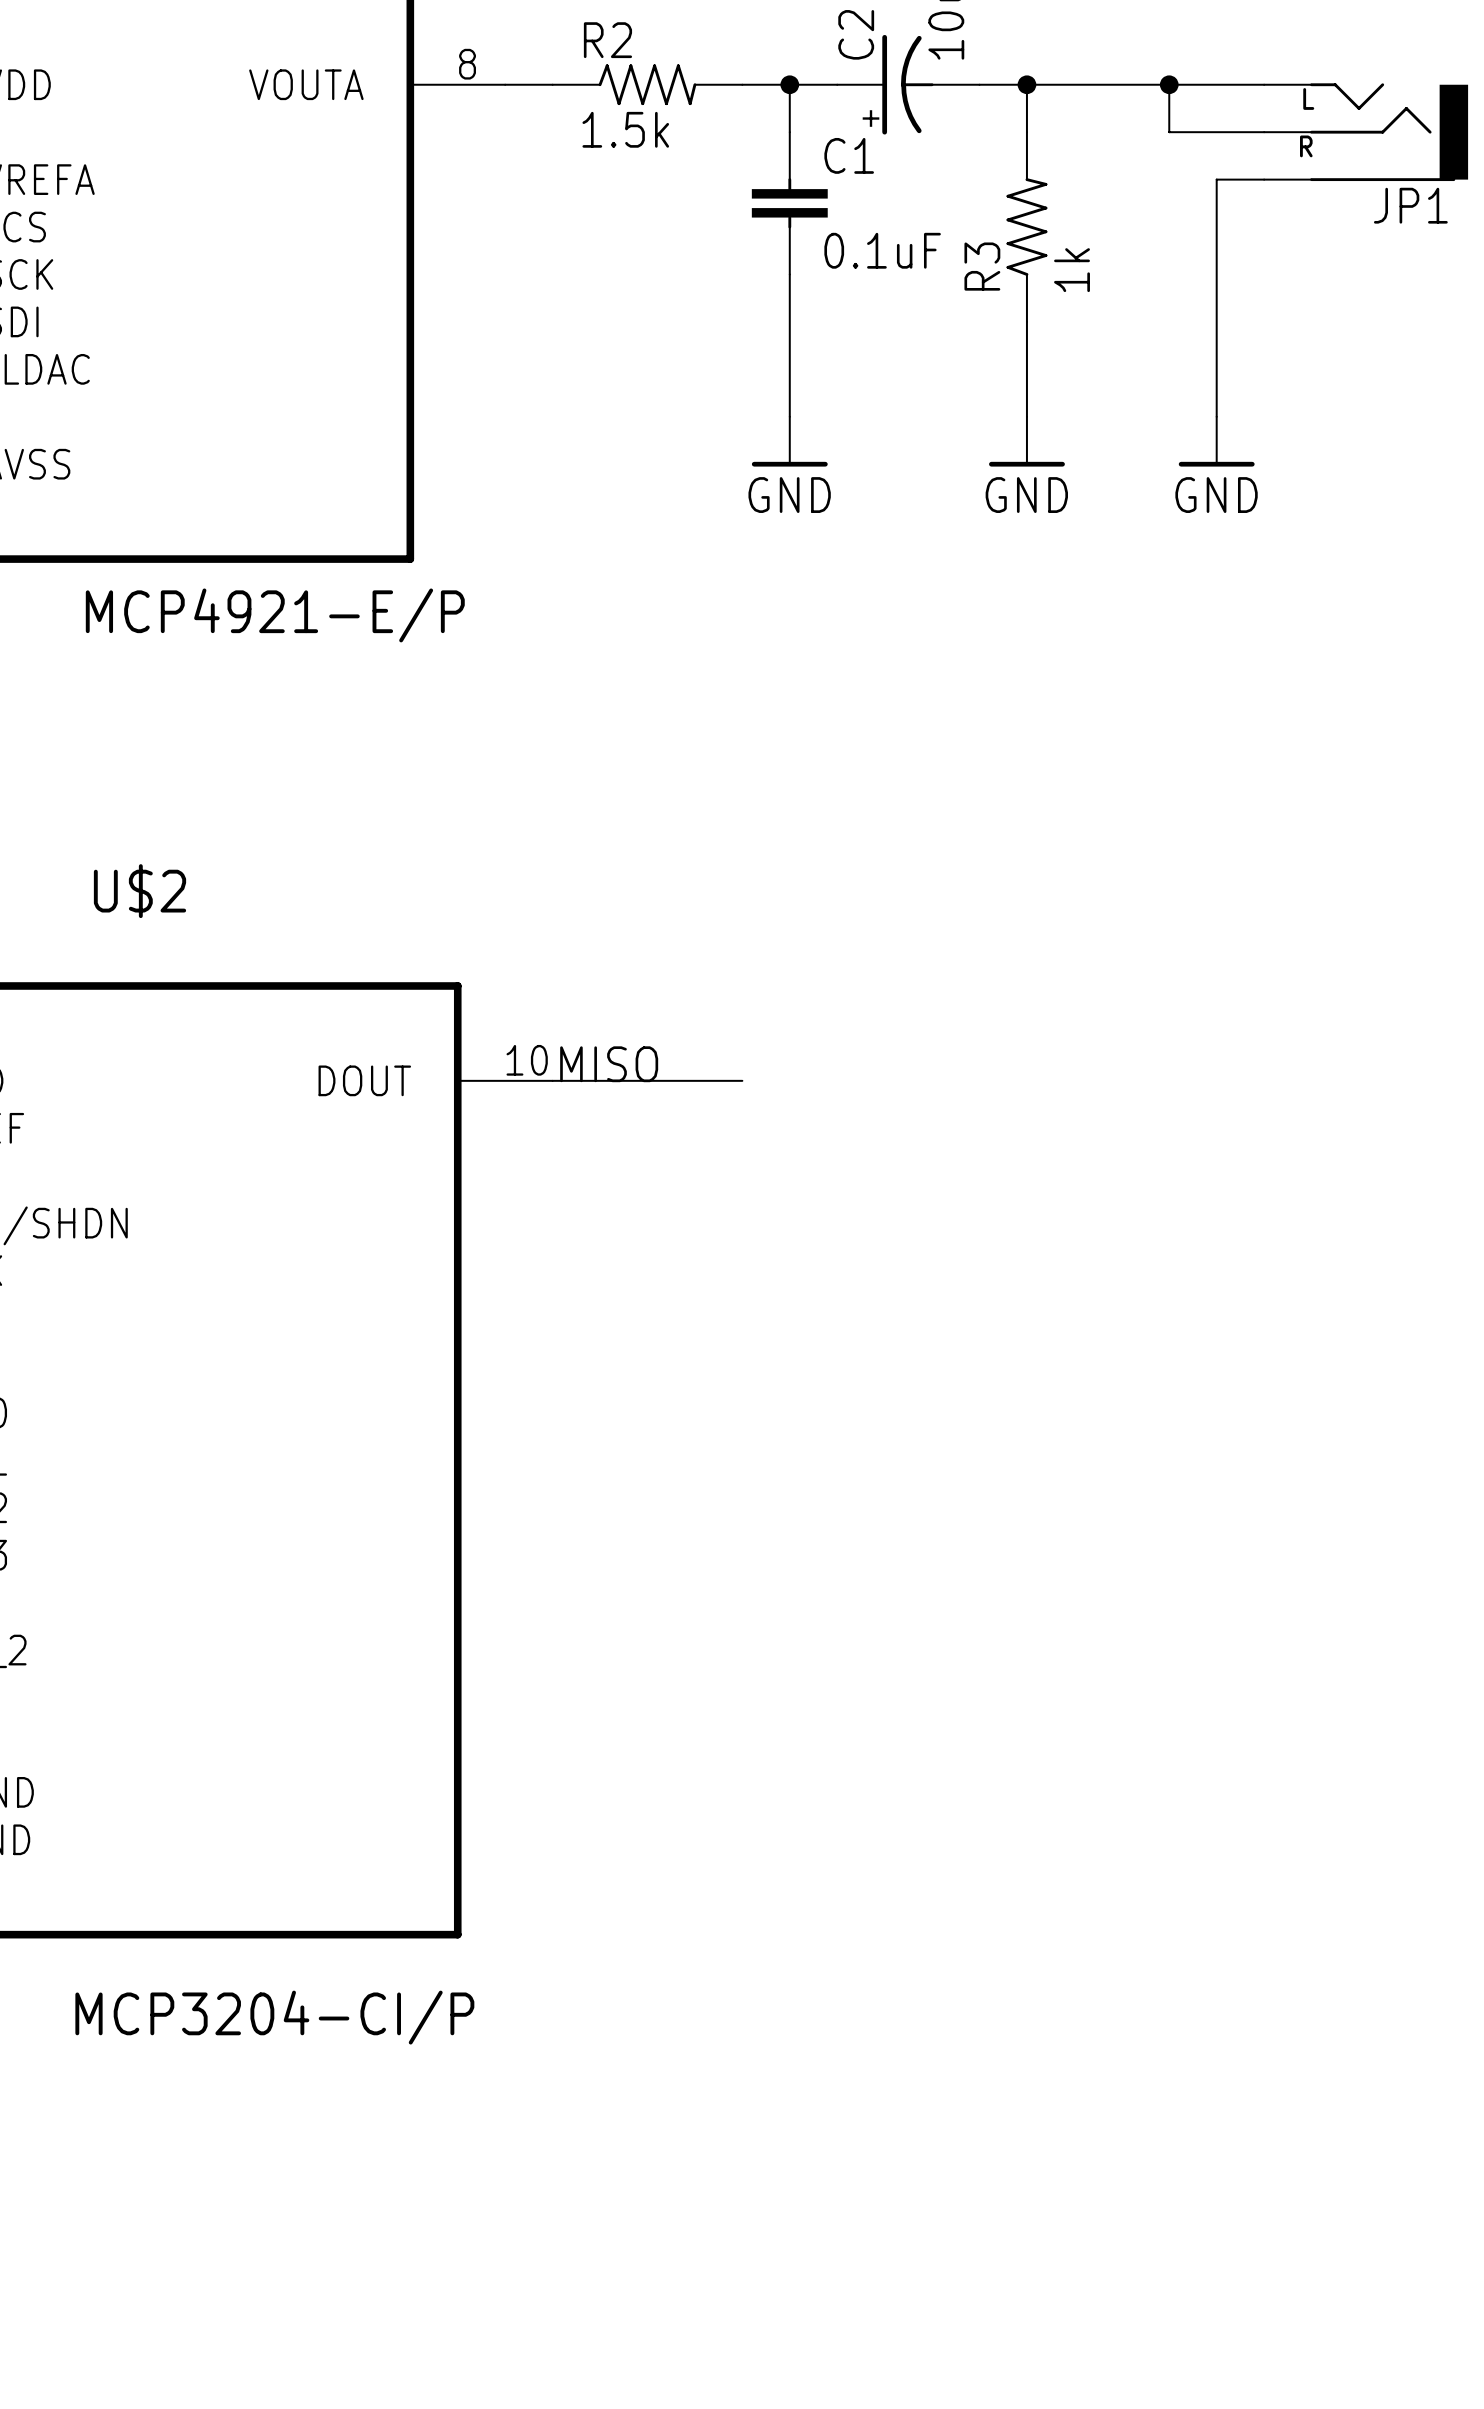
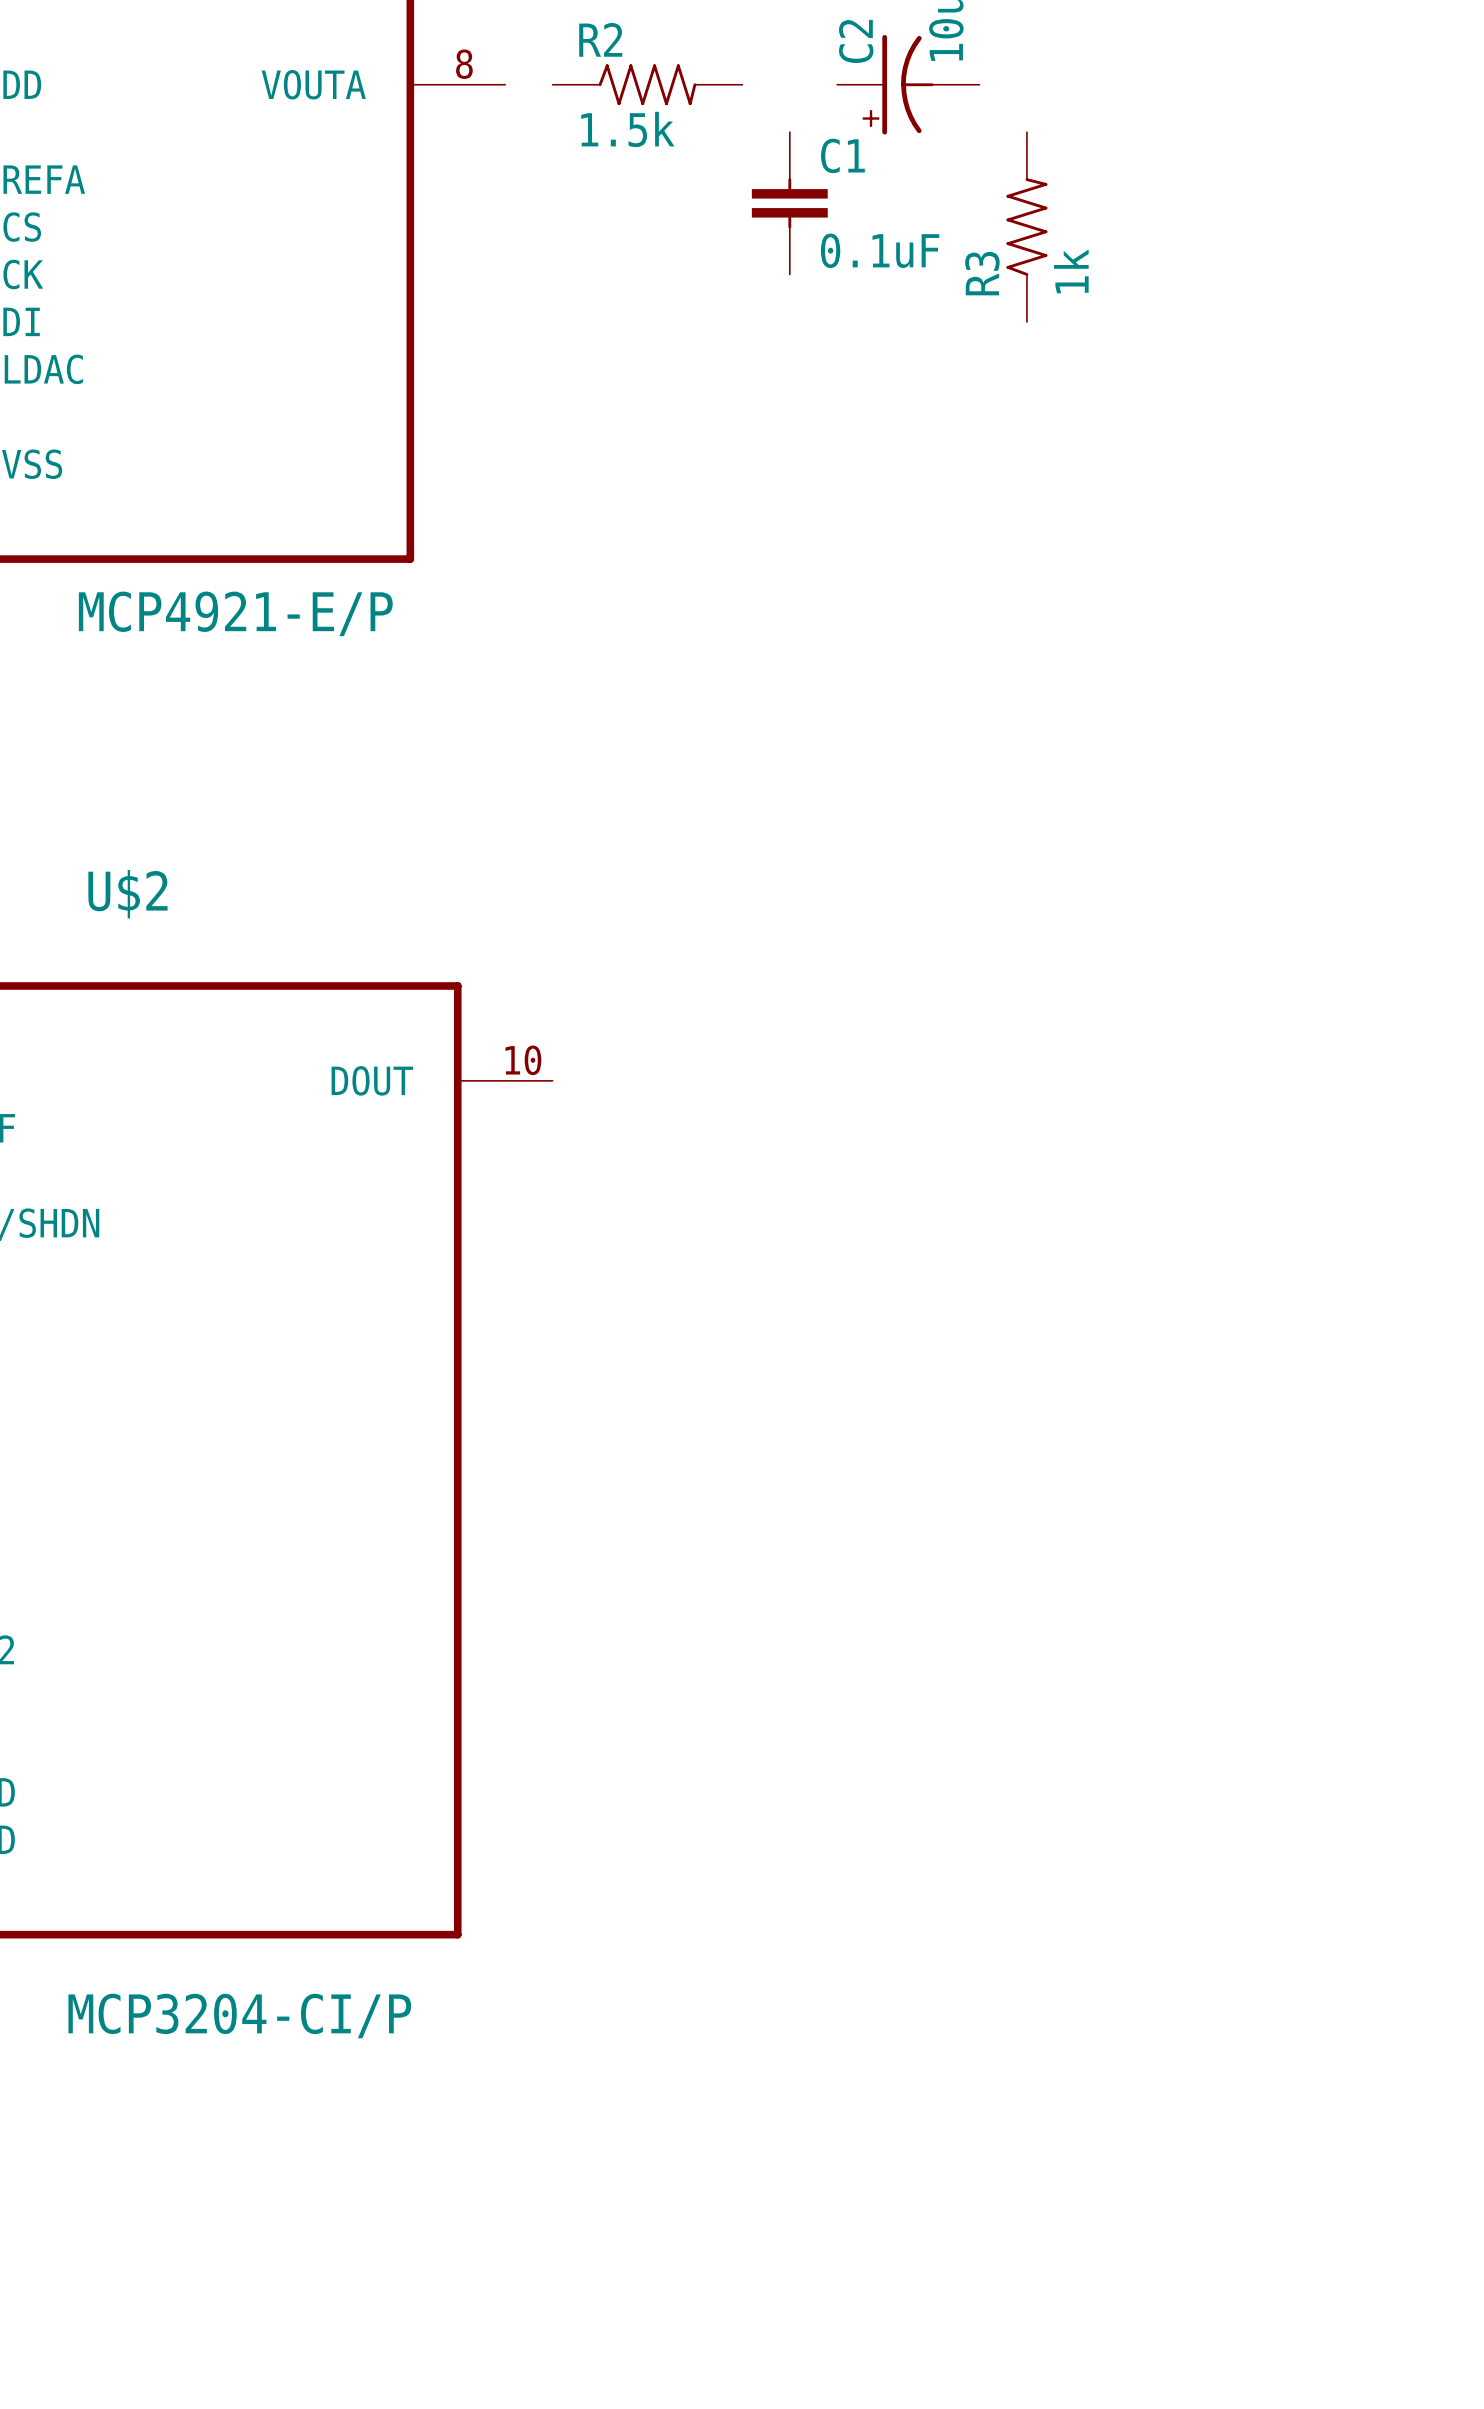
wire: (505, 84) (552, 84) -> none
wire: (742, 84) (837, 84) -> none
wire: (789, 84) (789, 132) -> none
junction: (789, 84) -> none
wire: (979, 84) (1264, 84) -> none
wire: (1026, 84) (1026, 132) -> none
junction: (1026, 84) -> none
wire: (1169, 84) (1169, 132) (1264, 132) -> none
junction: (1169, 84) -> none
JP1: (1366, 132) -> none
wire: (1264, 179) (1216, 179) (1216, 416) -> none
wire: (789, 274) (789, 416) -> none
wire: (1026, 321) (1026, 416) -> none
power symbol: GND (789, 441) -> none
power symbol: GND (1026, 441) -> none
power symbol: GND (1216, 441) -> none
label: MISO (609, 1064) -> none
wire: (552, 1080) (742, 1080) -> none

